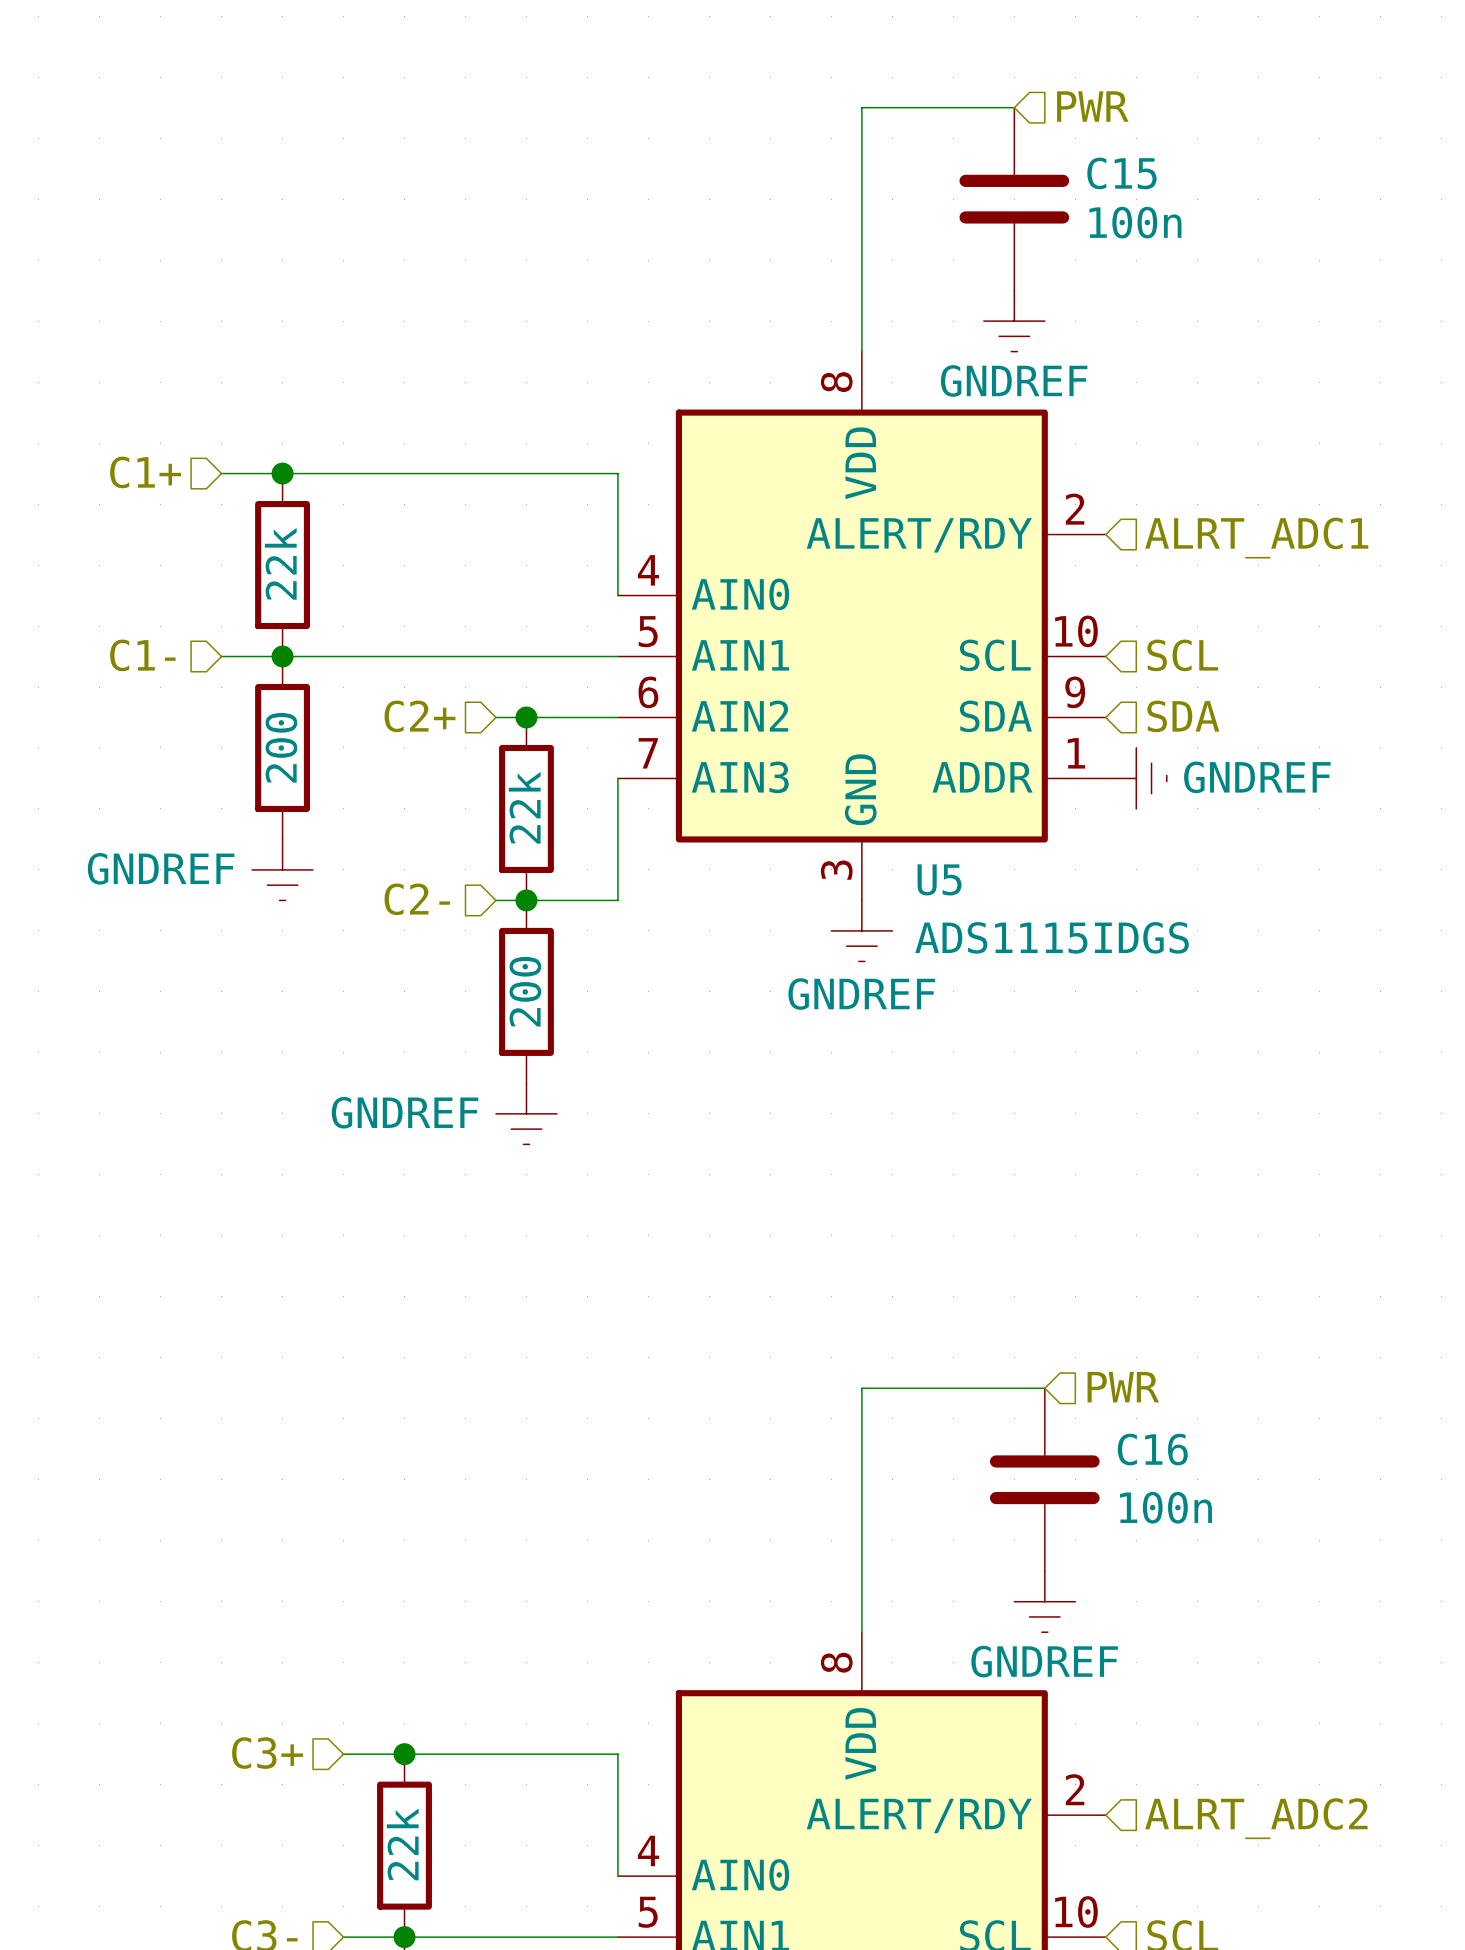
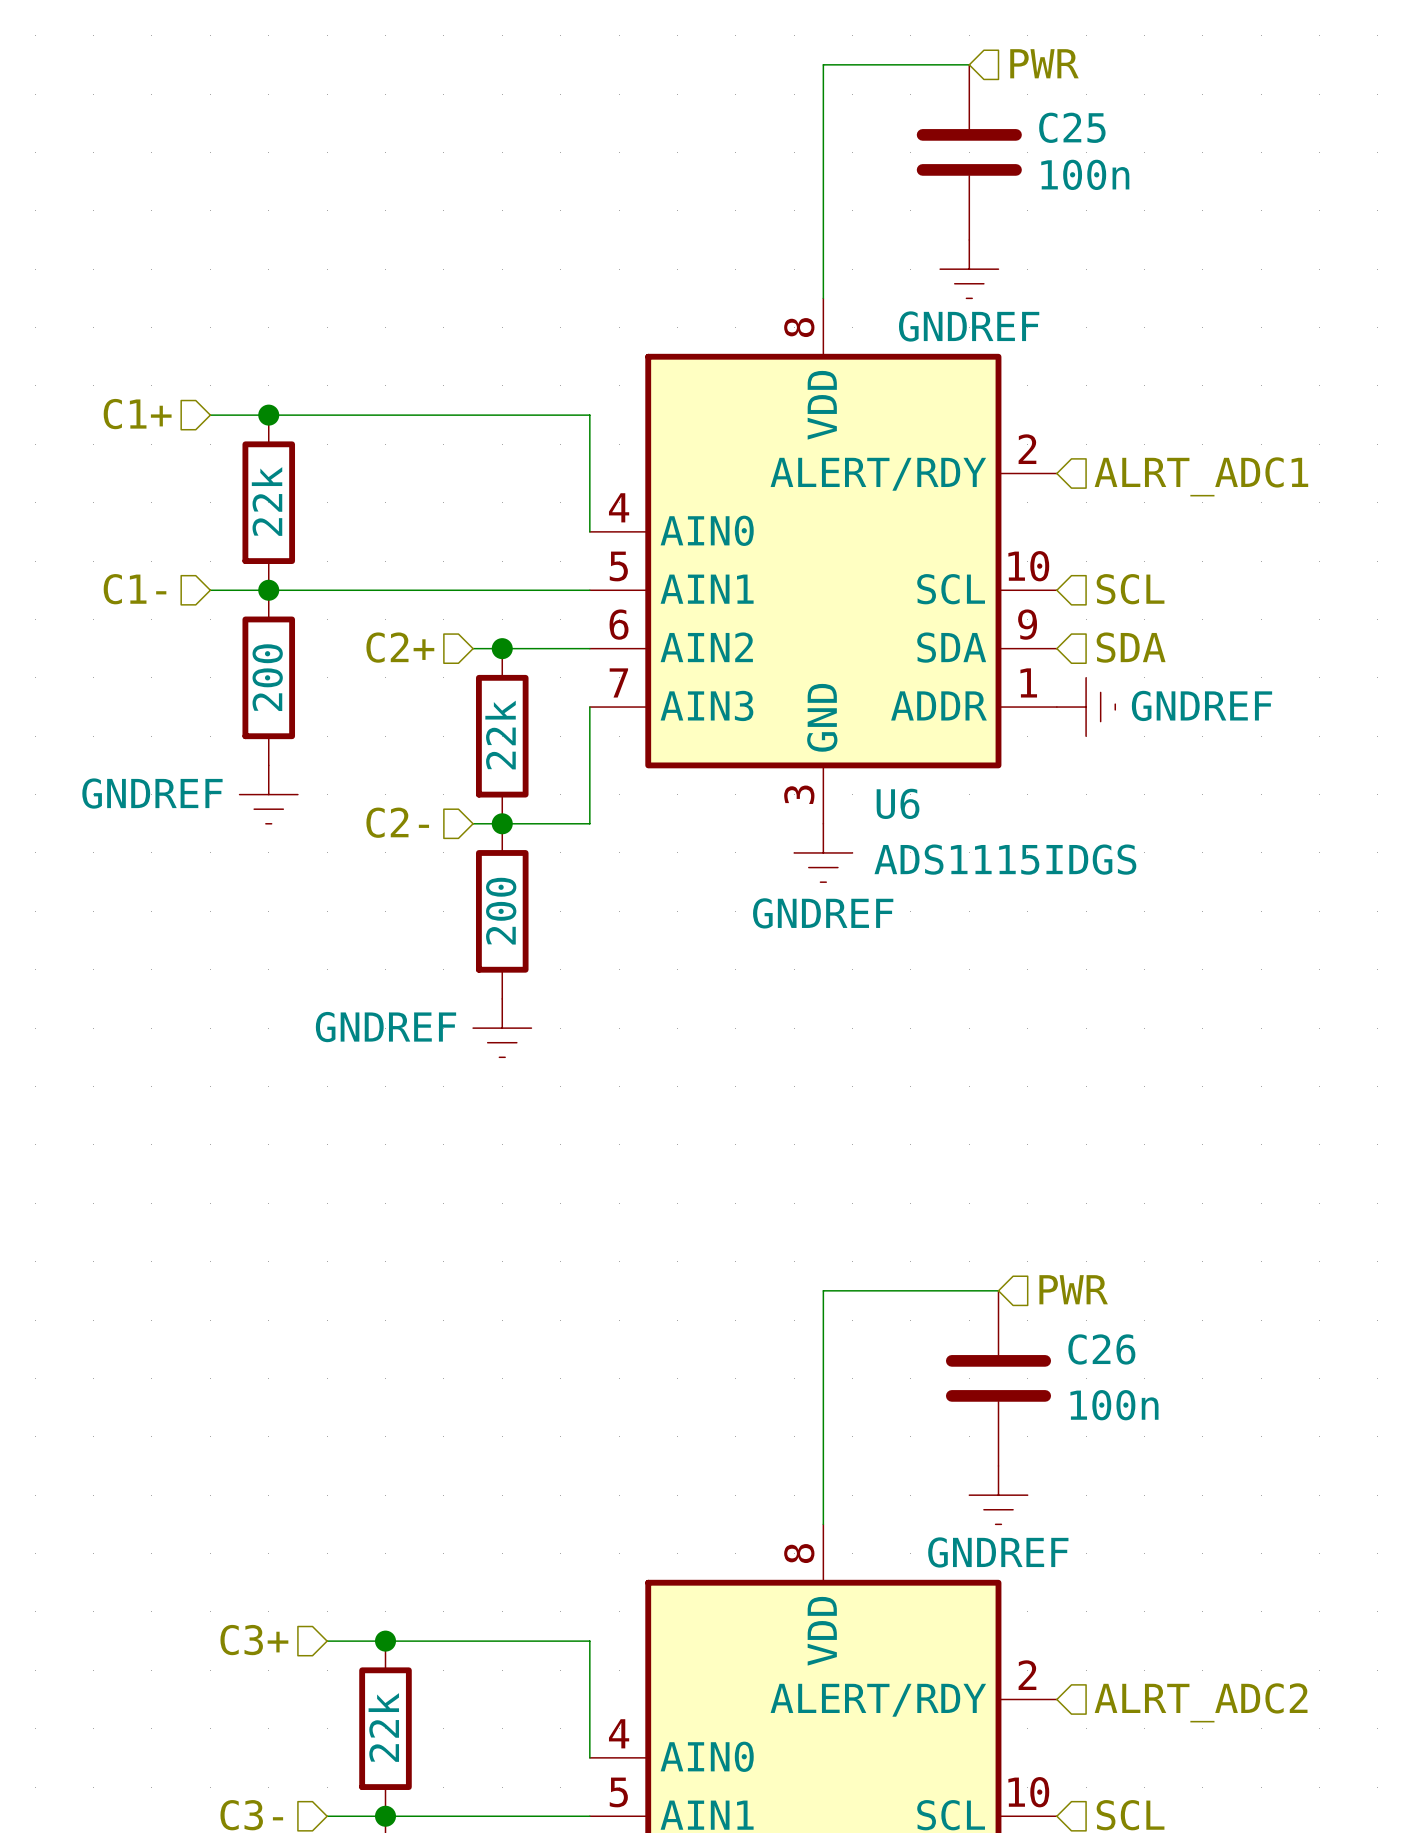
C15 name: C15 (1121, 173) -> C25 (1072, 127)
U5 name: U5 (939, 879) -> U6 (898, 803)
C16 name: C16 (1152, 1449) -> C26 (1101, 1349)

